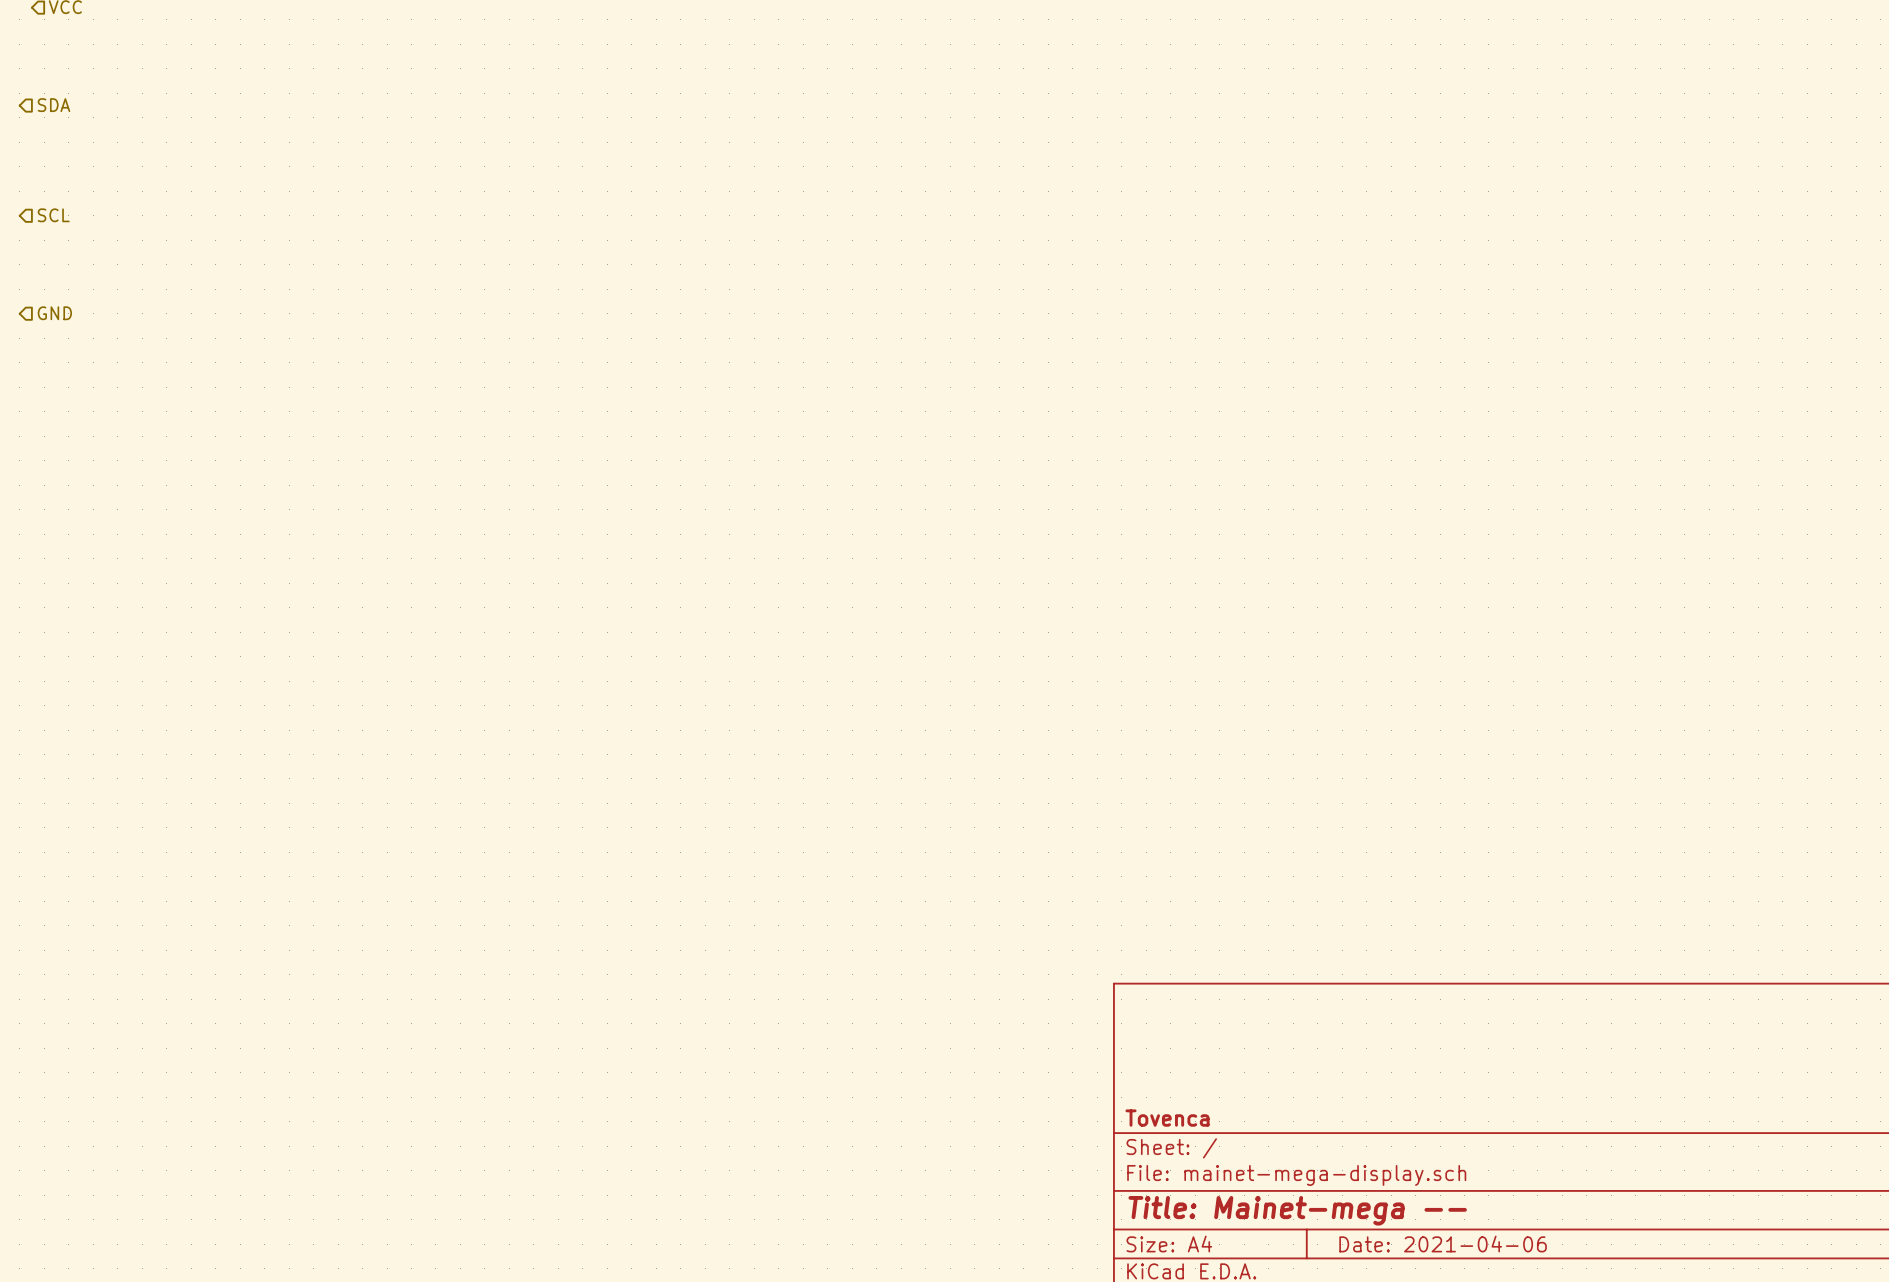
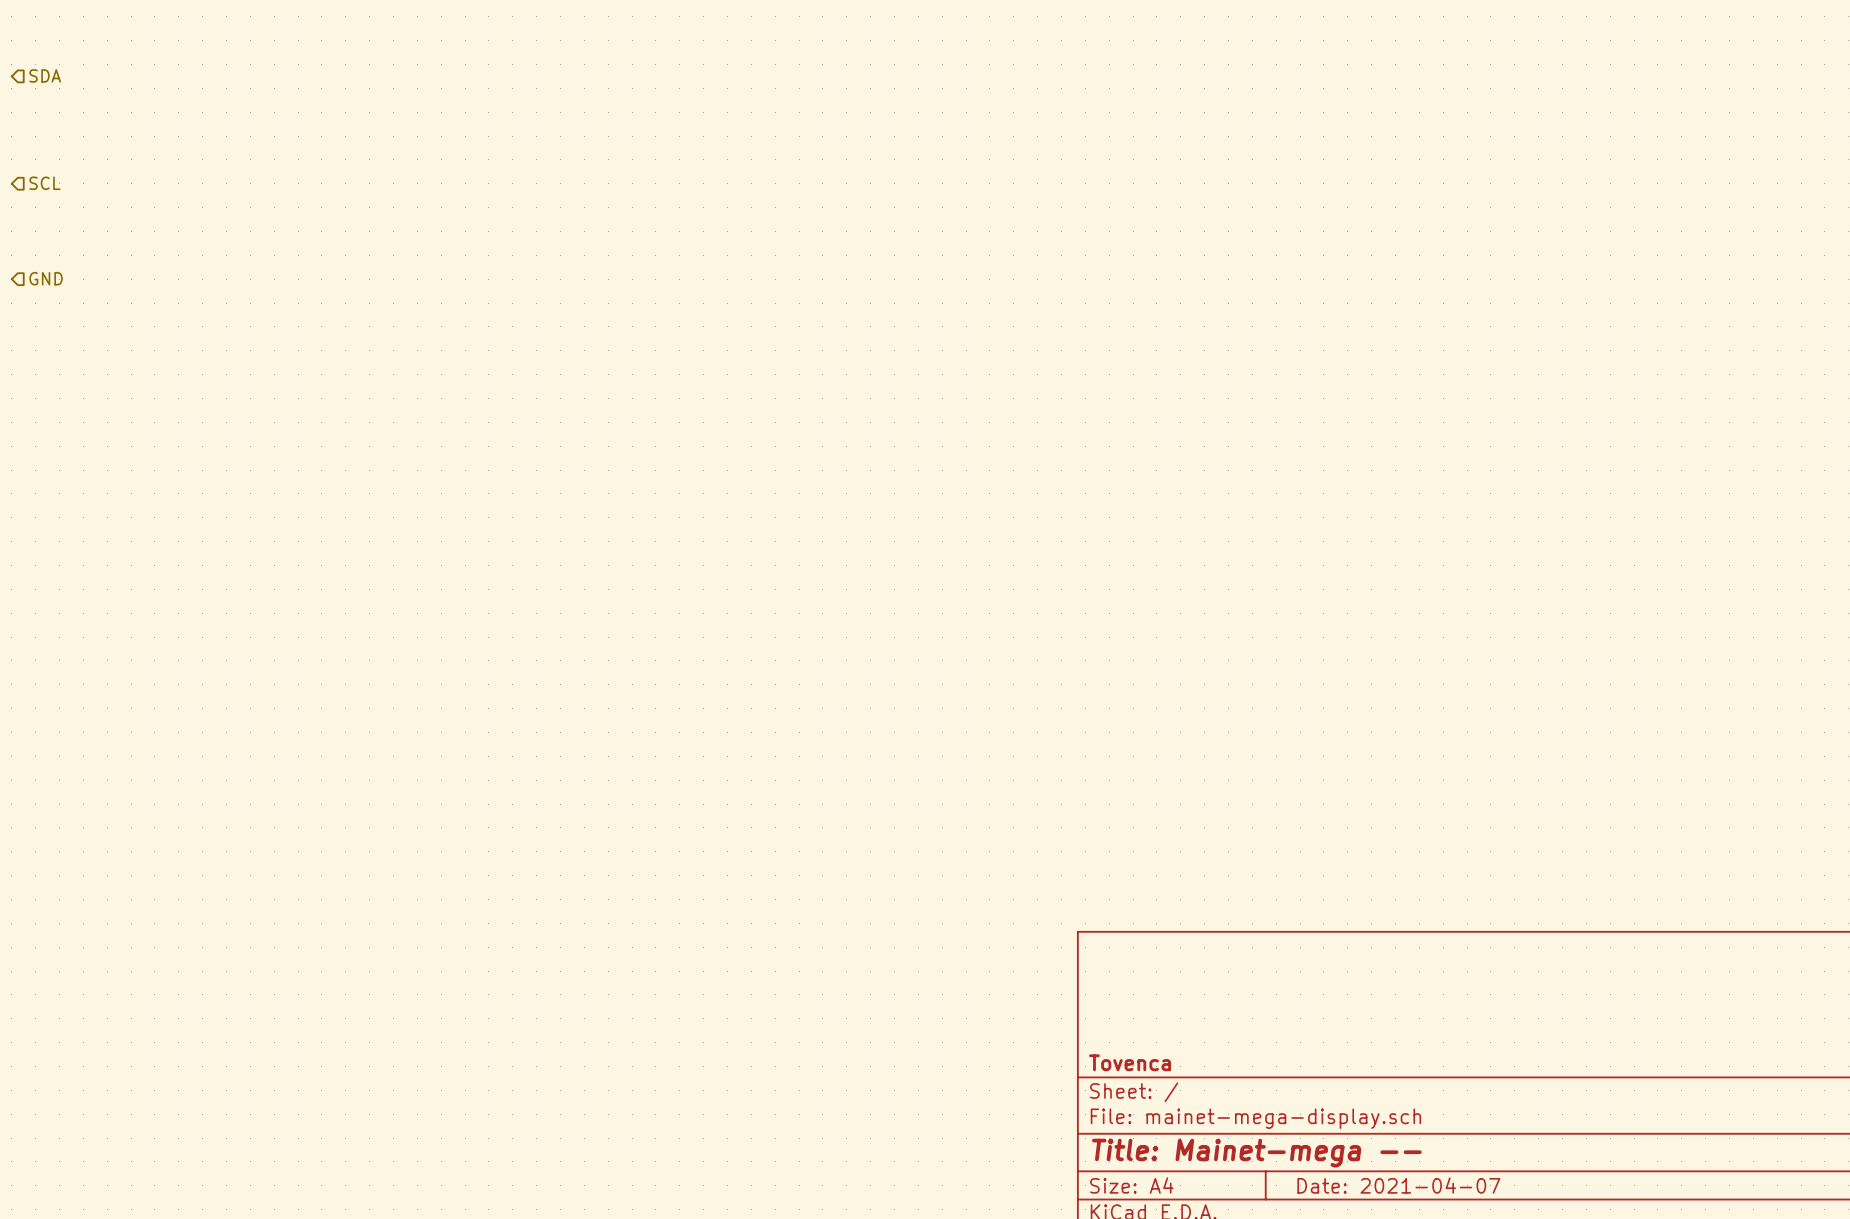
title block: Date: 2021-04-06 (1443, 1244) -> Date: 2021-04-07 (1398, 1185)

